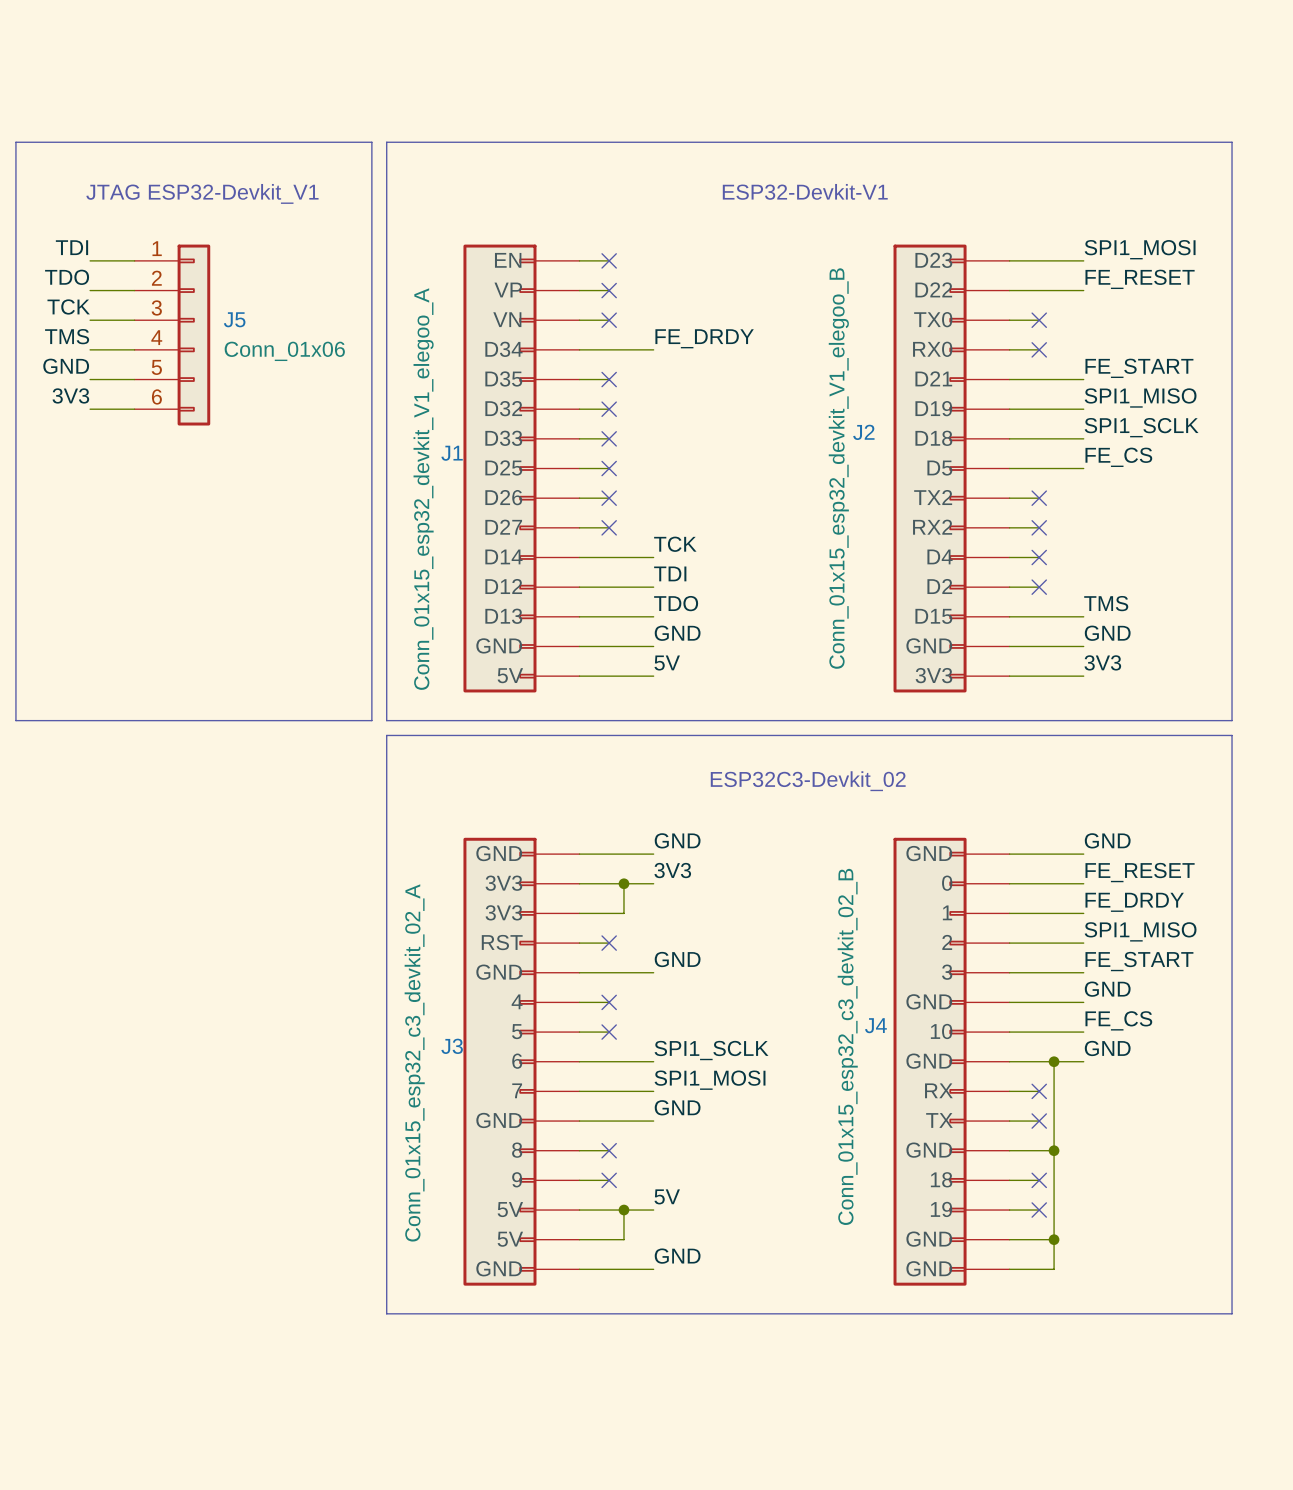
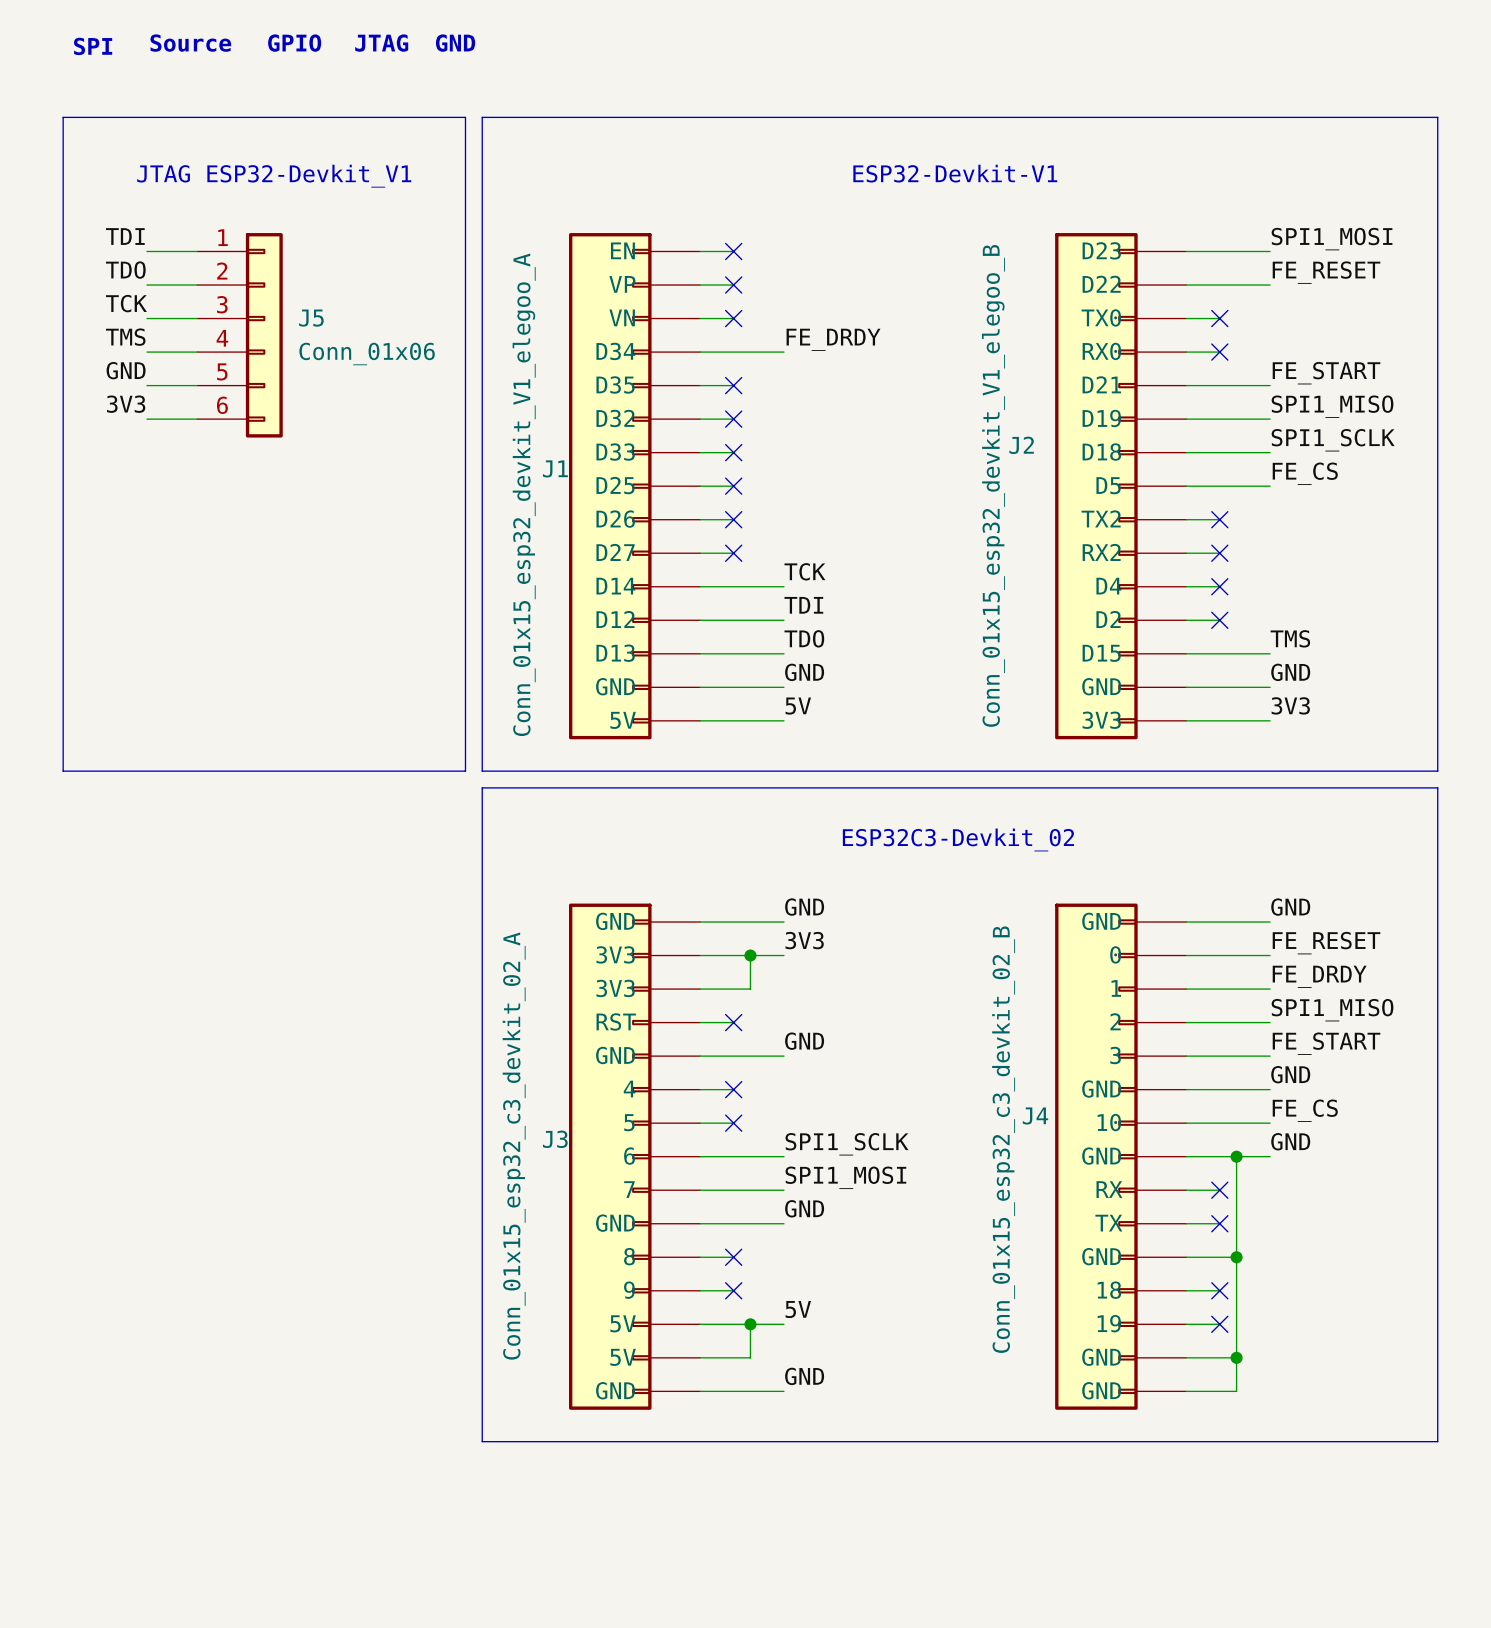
text: none -> Source (190, 43)
text: none -> GPIO (294, 43)
text: none -> JTAG (381, 43)
text: none -> GND (455, 43)
text: none -> SPI (93, 46)

